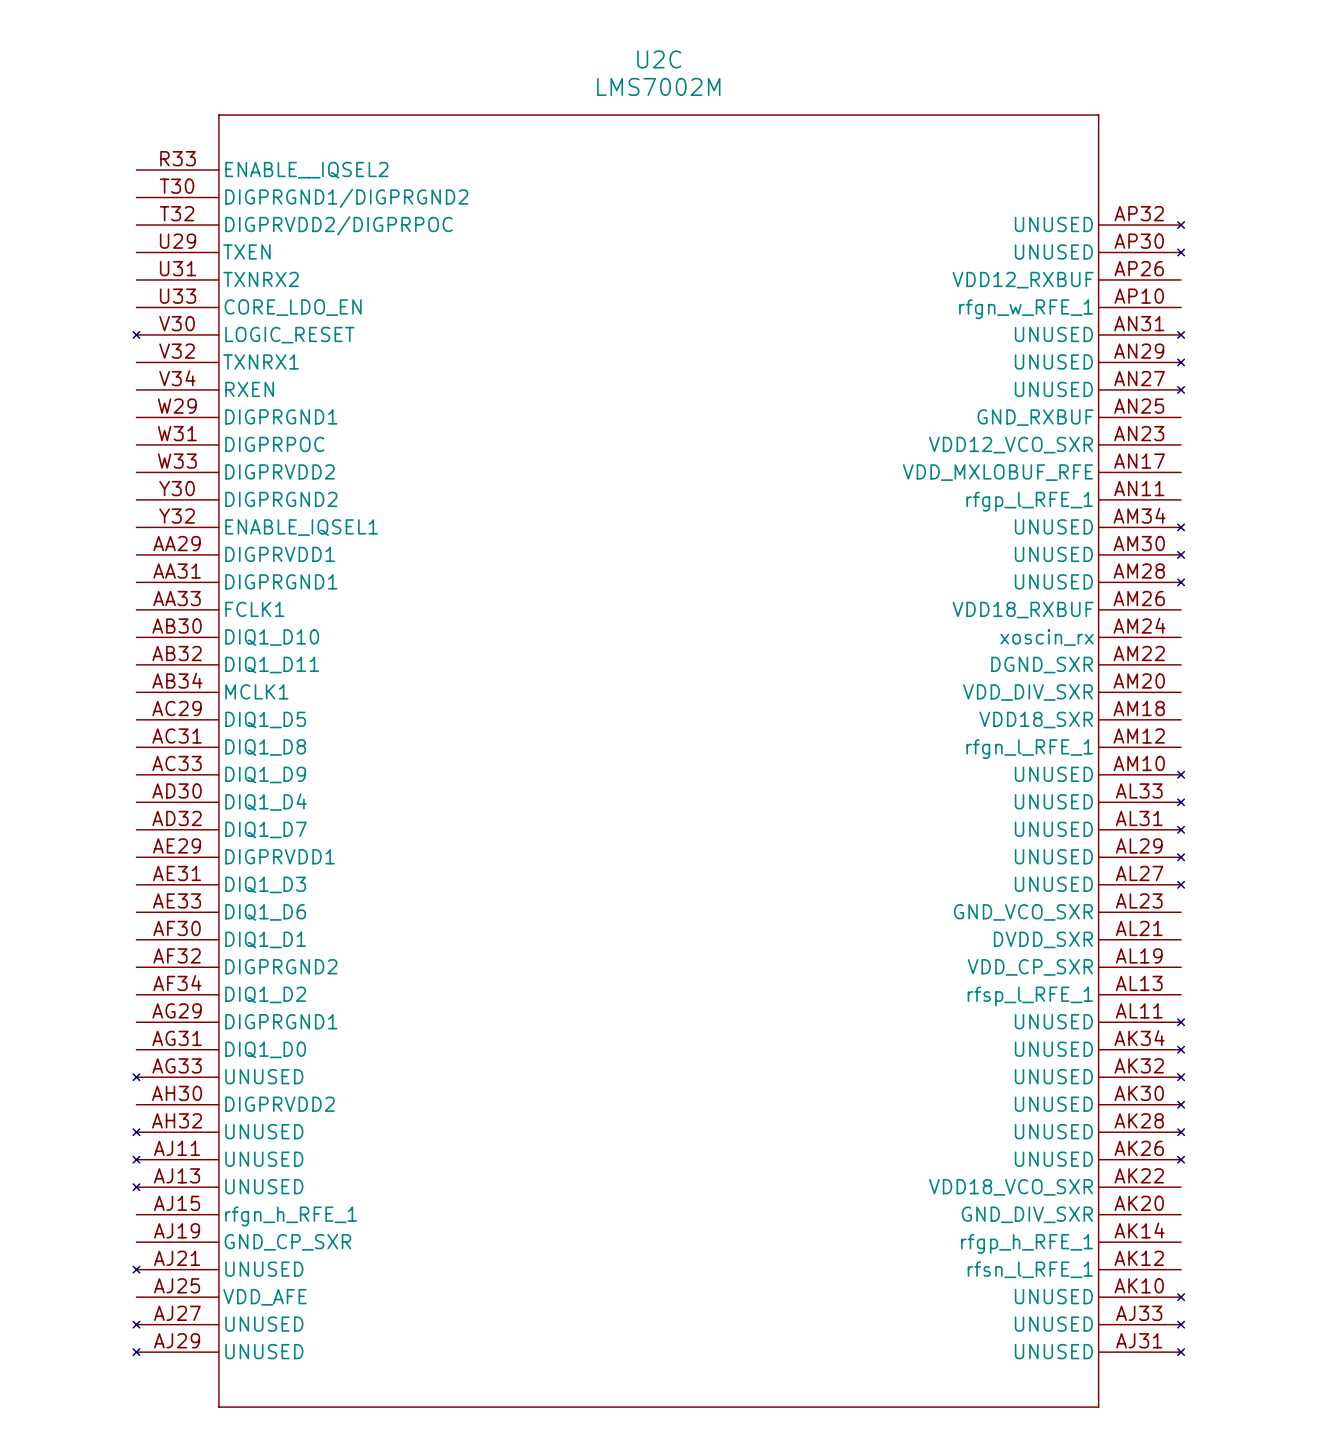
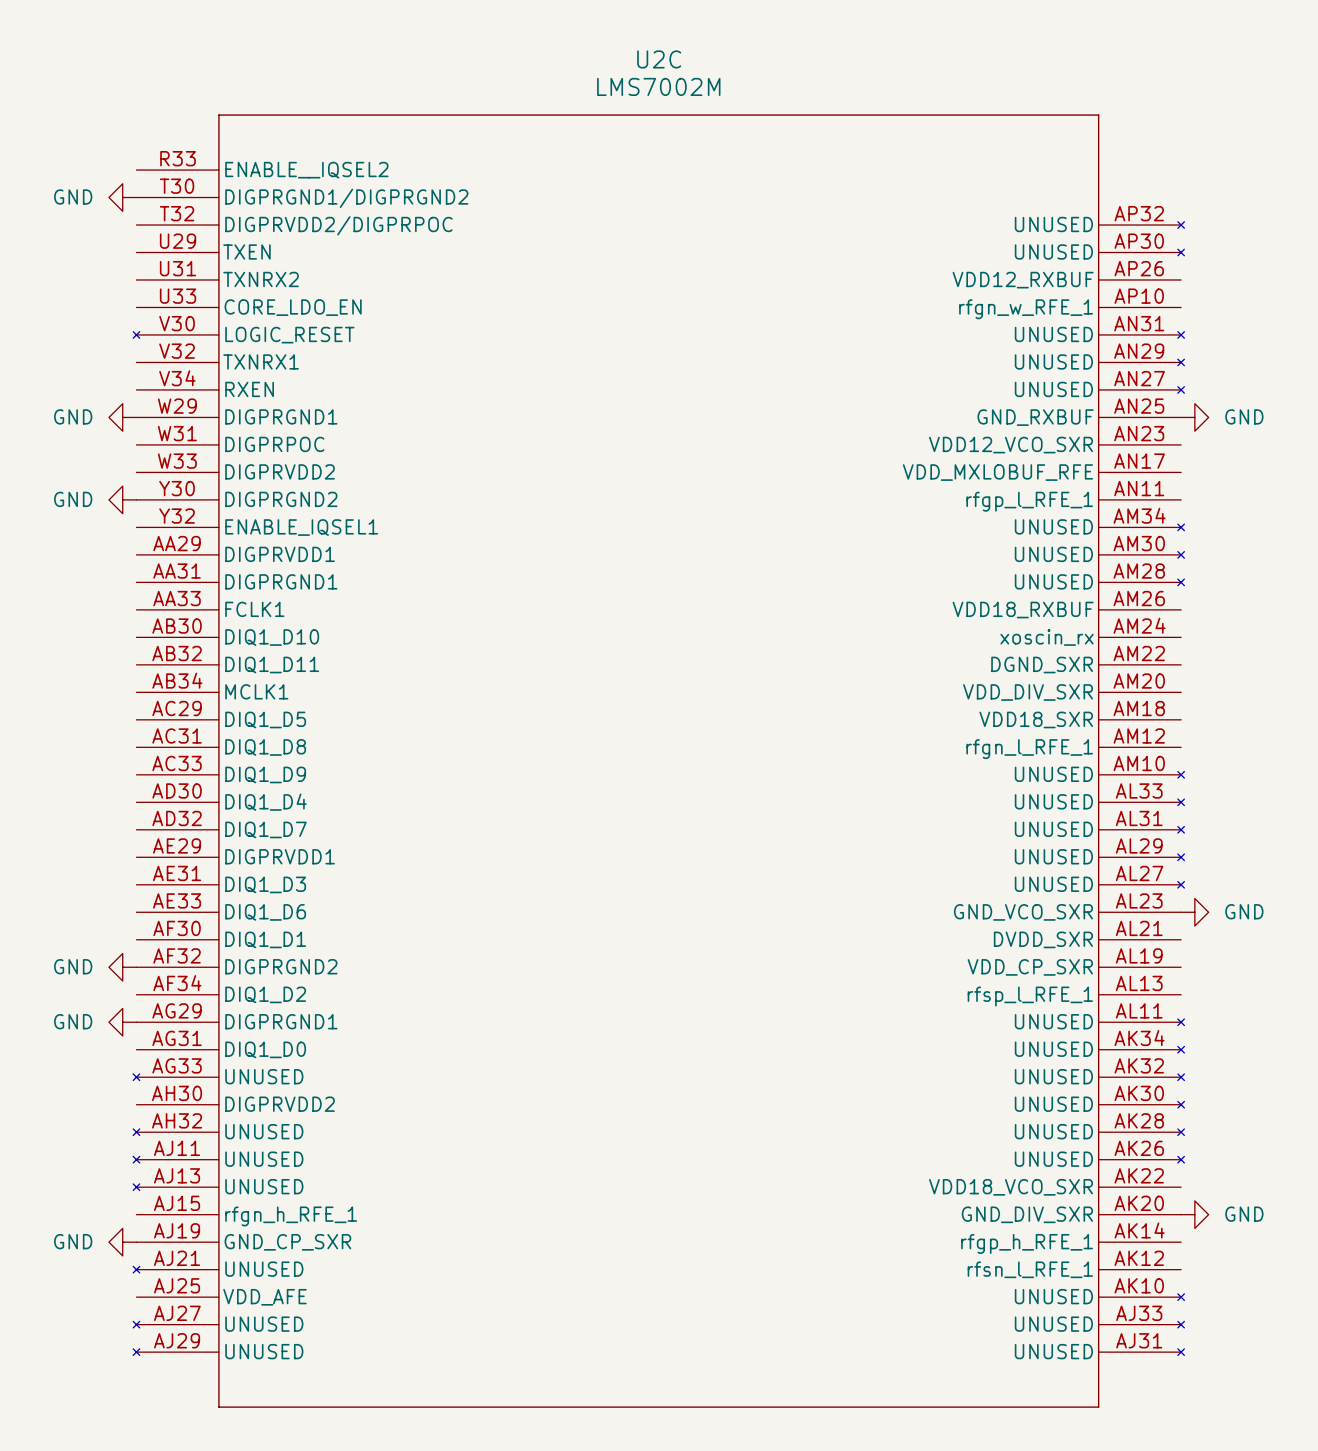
power symbol: none -> GND (122, 197)
power symbol: none -> GND (122, 417)
power symbol: none -> GND (1194, 417)
power symbol: none -> GND (122, 499)
power symbol: none -> GND (1194, 912)
power symbol: none -> GND (122, 967)
power symbol: none -> GND (122, 1022)
power symbol: none -> GND (1194, 1214)
power symbol: none -> GND (122, 1242)

